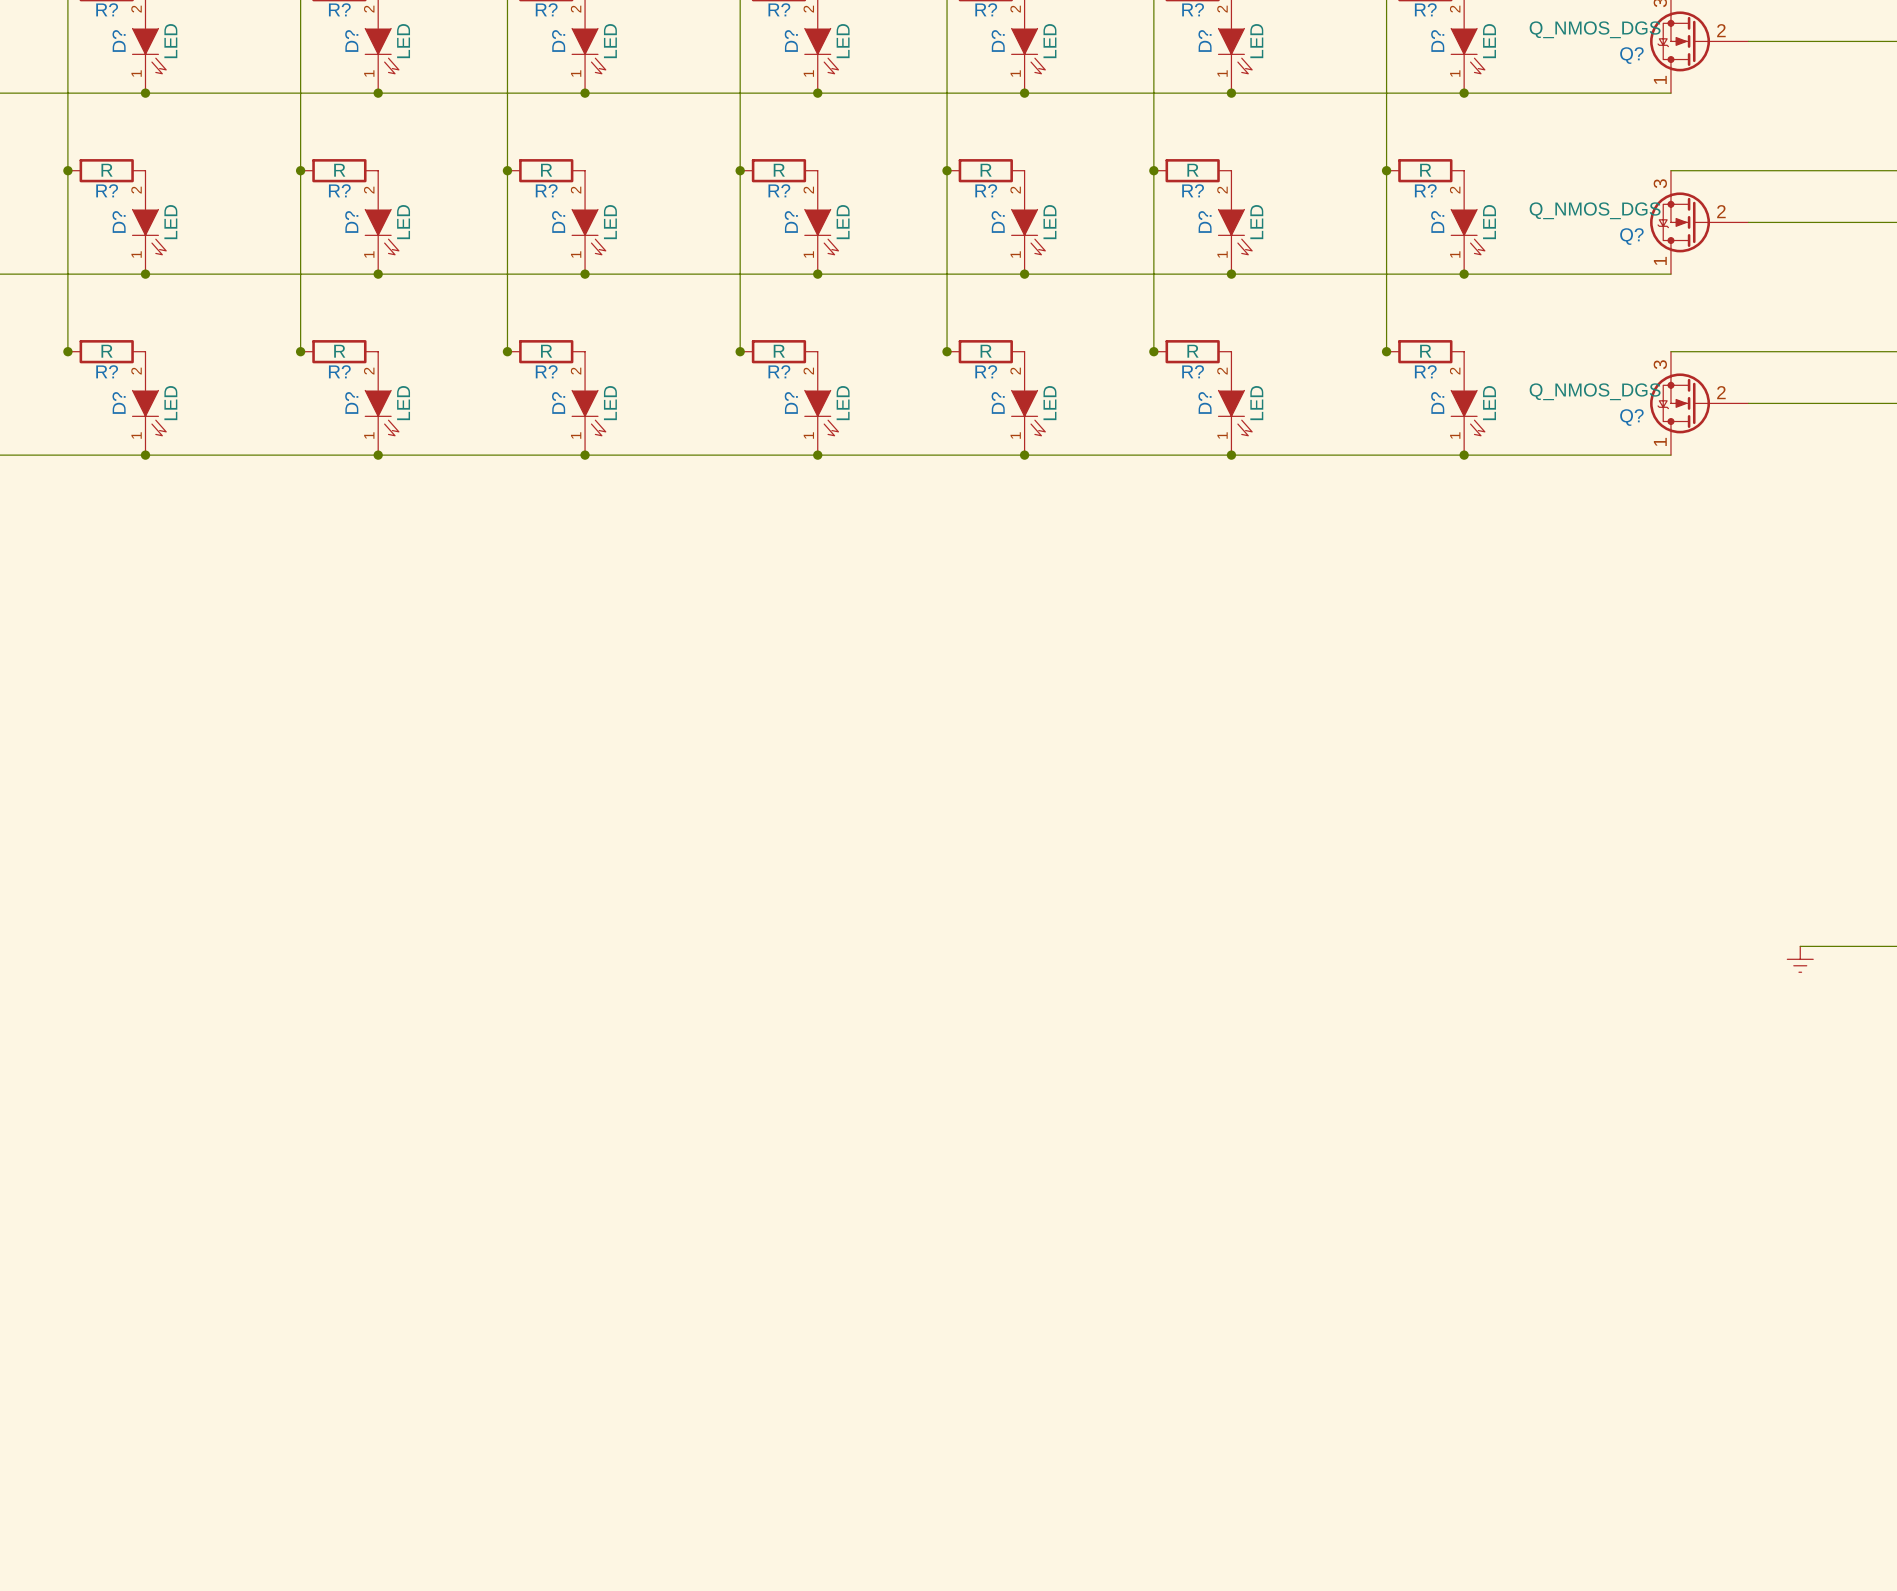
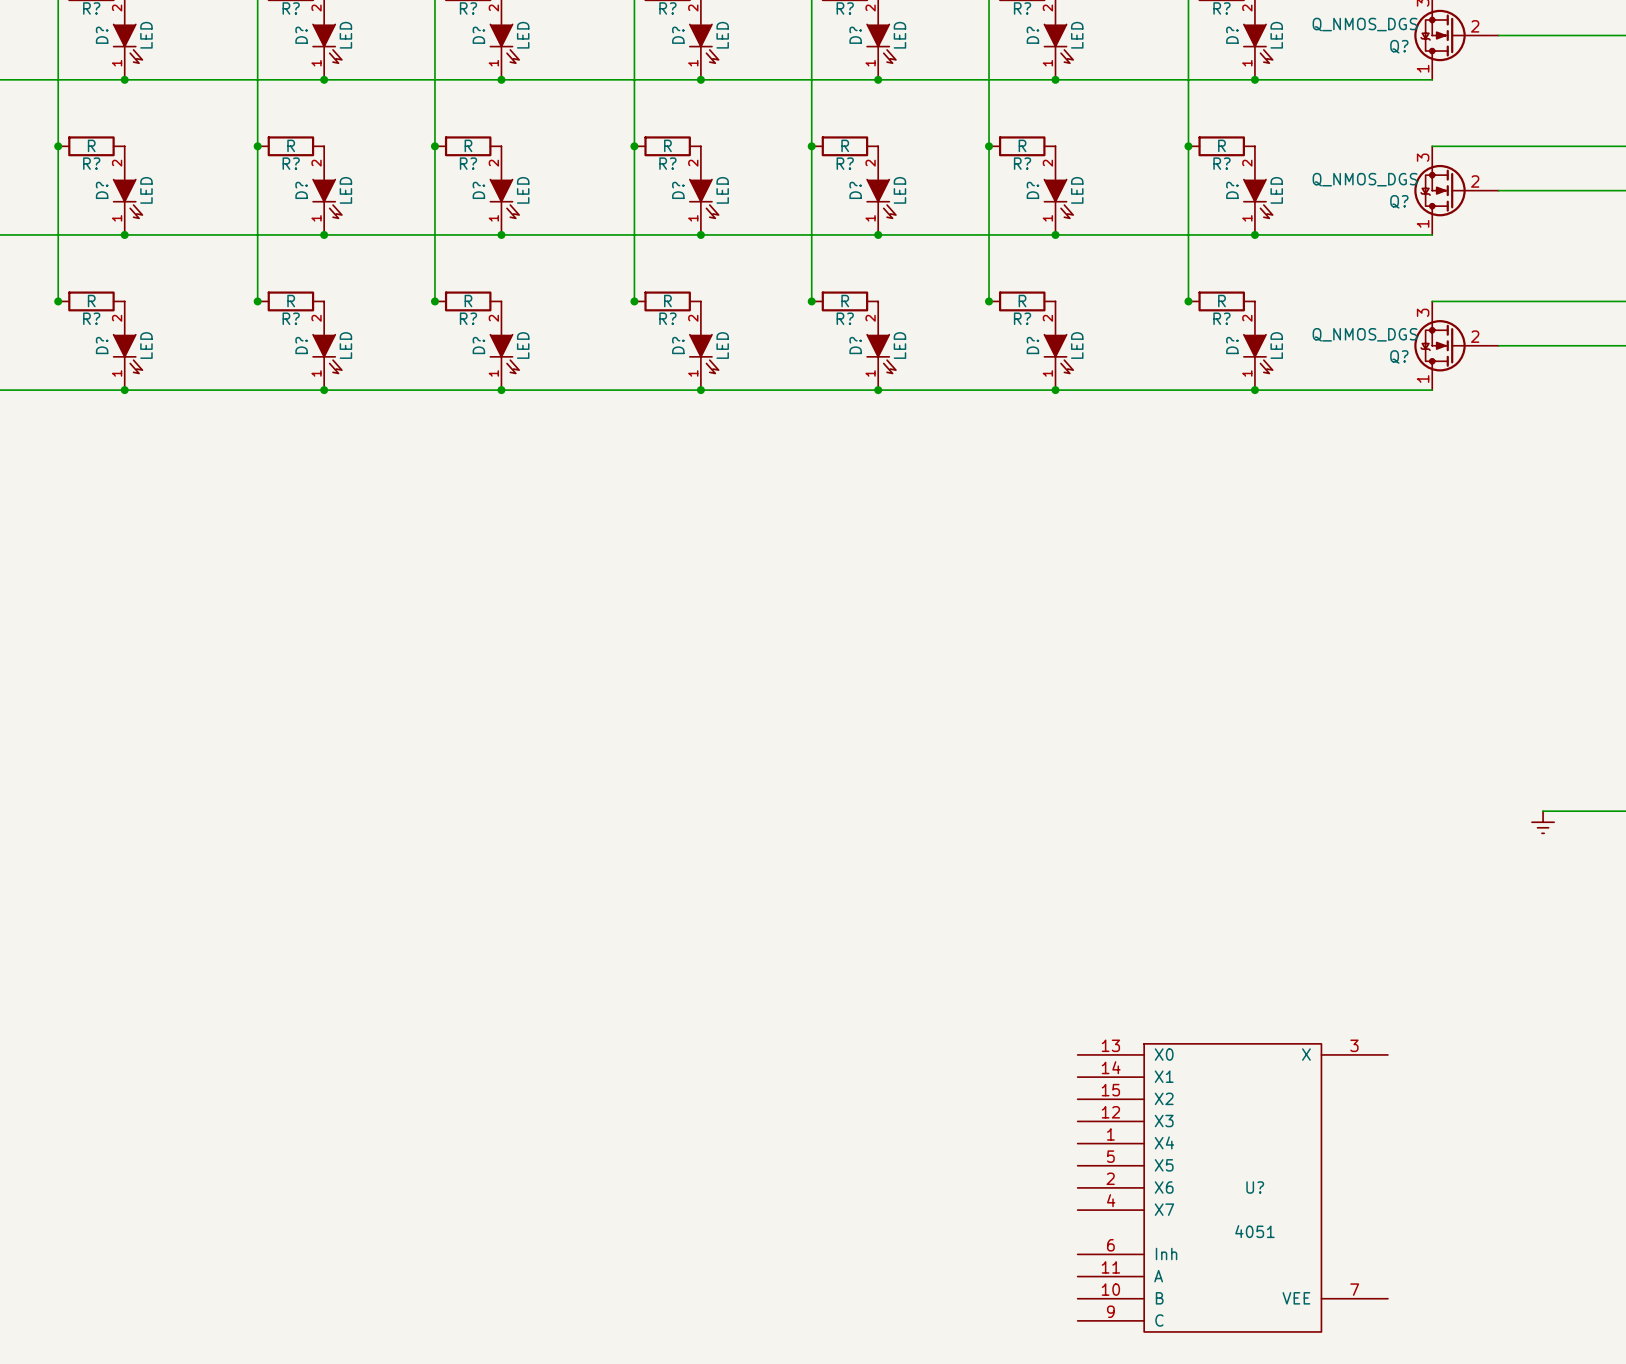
U?: none -> 4051 (1232, 1187)

